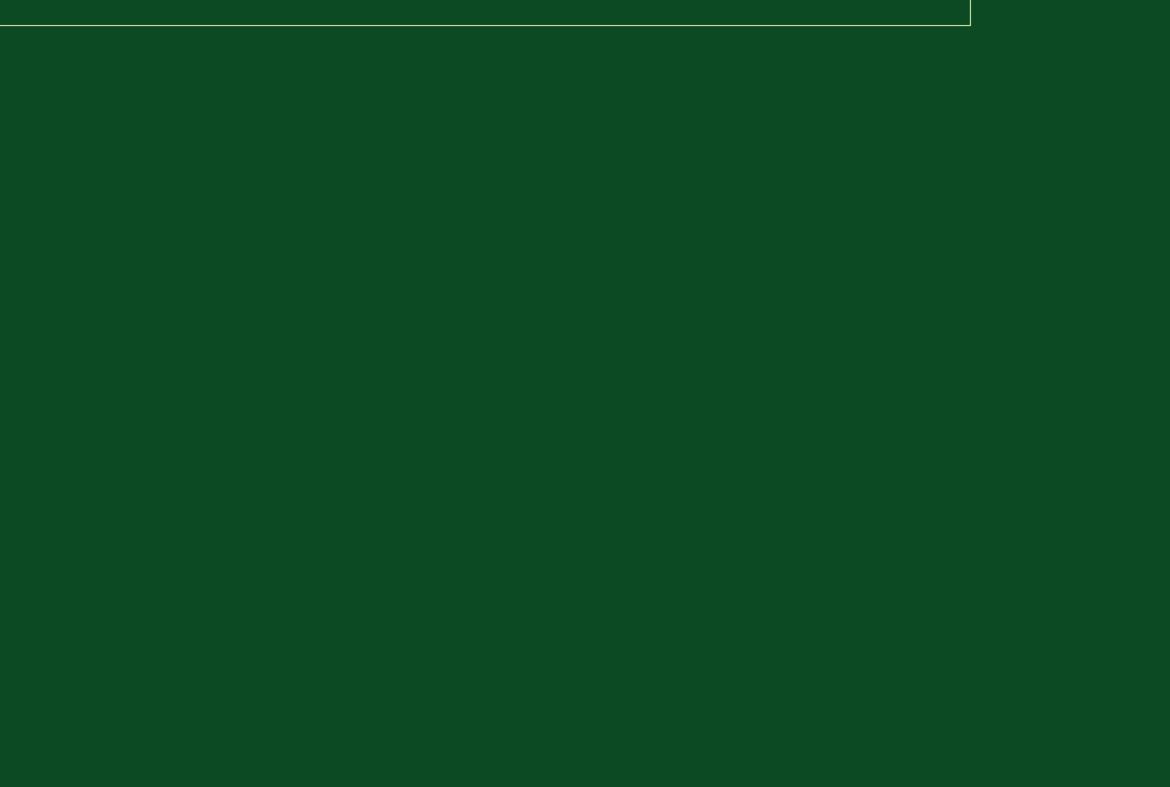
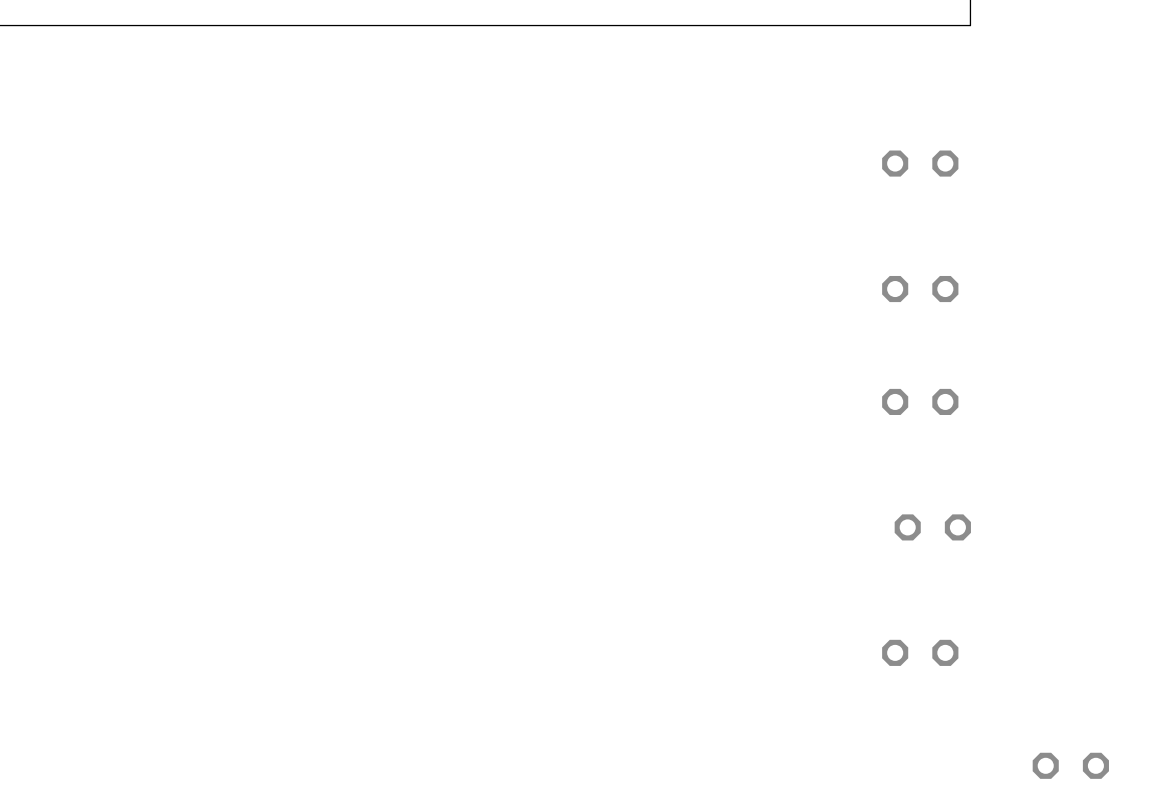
part: none -> (920, 163)
part: none -> (920, 289)
part: none -> (920, 401)
part: none -> (932, 527)
part: none -> (920, 652)
part: none -> (1070, 765)

